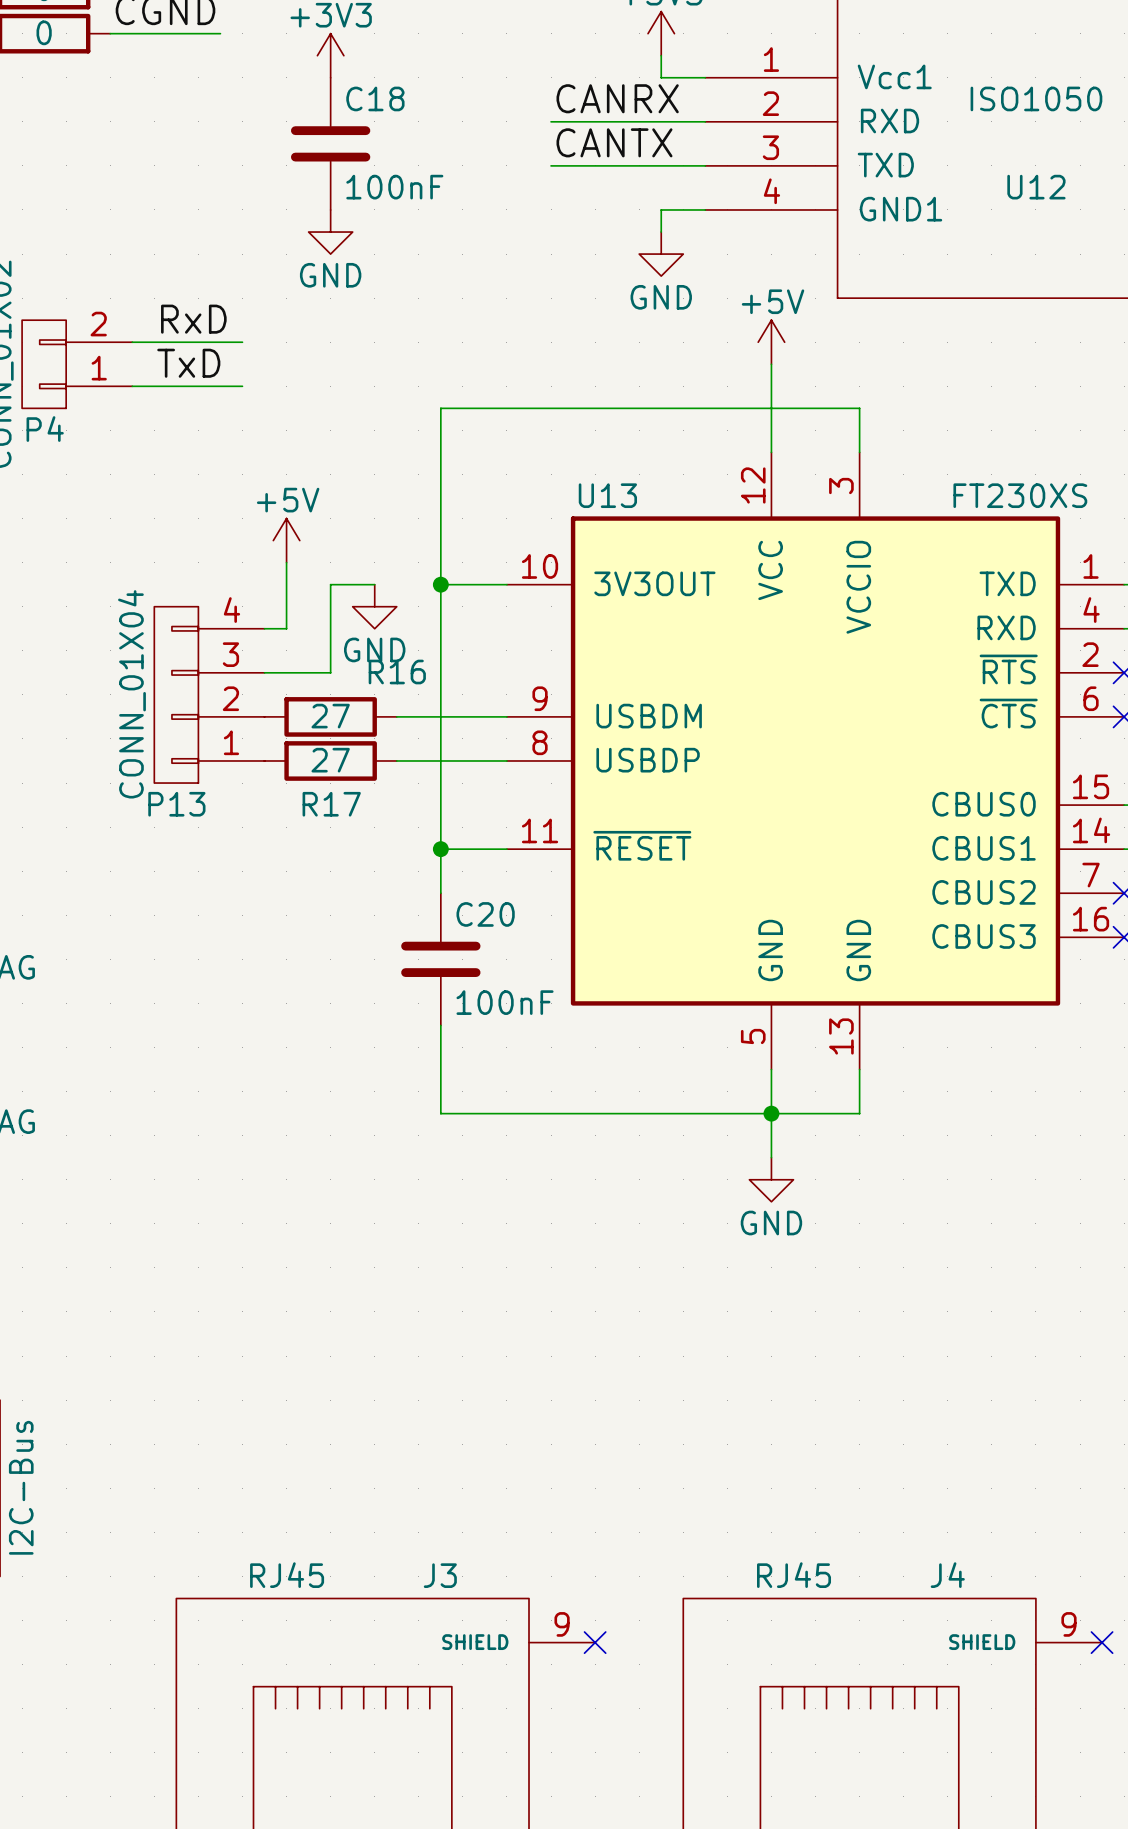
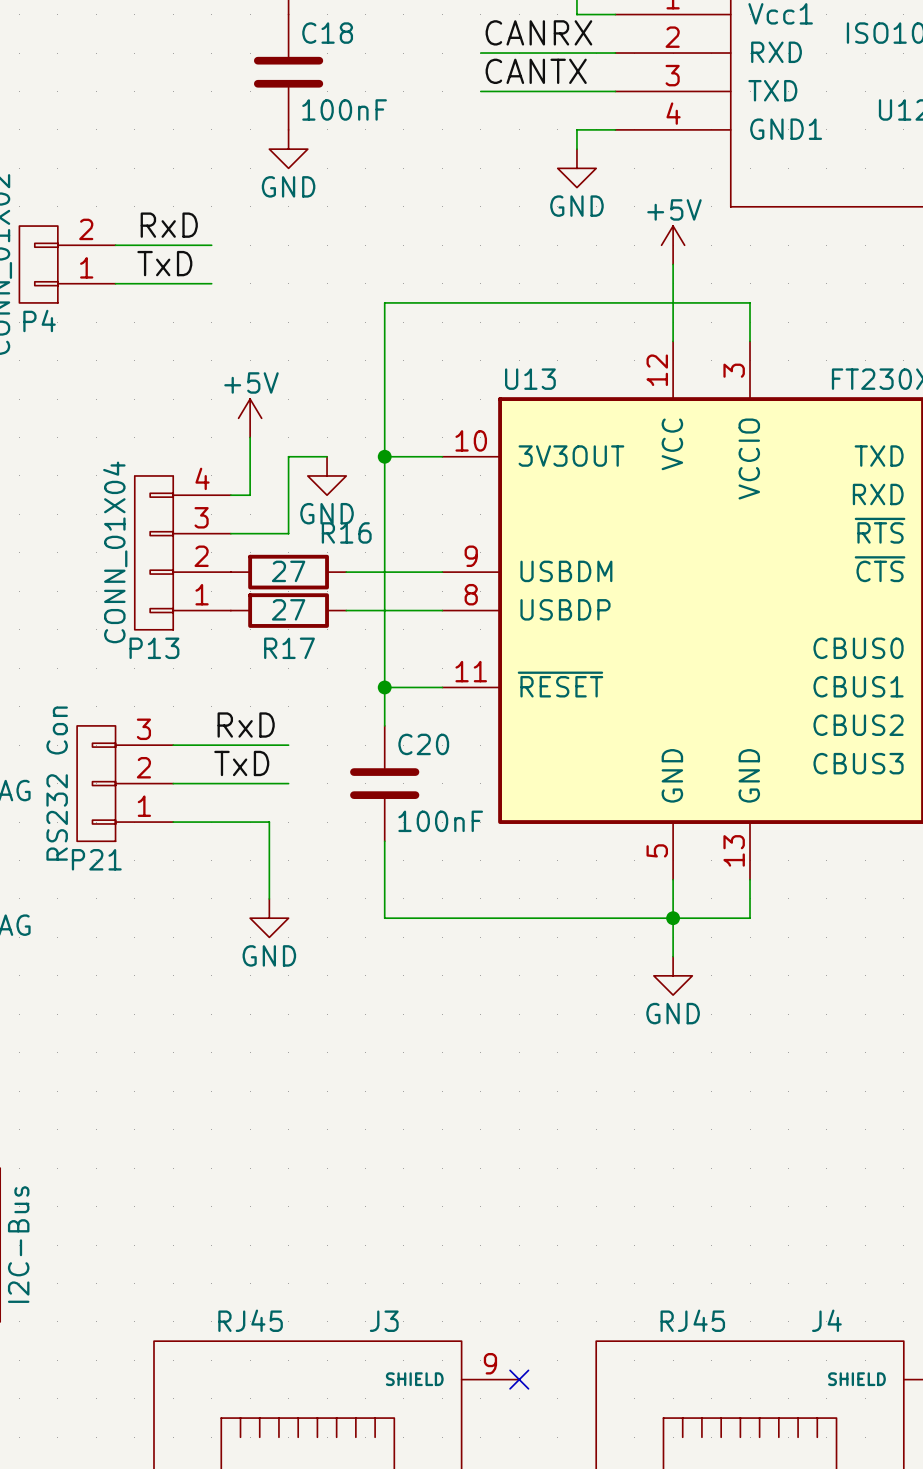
label: none -> RxD (246, 725)
wire: none -> (173, 745) (288, 745)
label: none -> TxD (241, 763)
P21: none -> RS232 Con (125, 783)
wire: none -> (173, 783) (288, 783)
wire: none -> (173, 822) (269, 822) (269, 898)
power symbol: none -> GND (269, 918)

